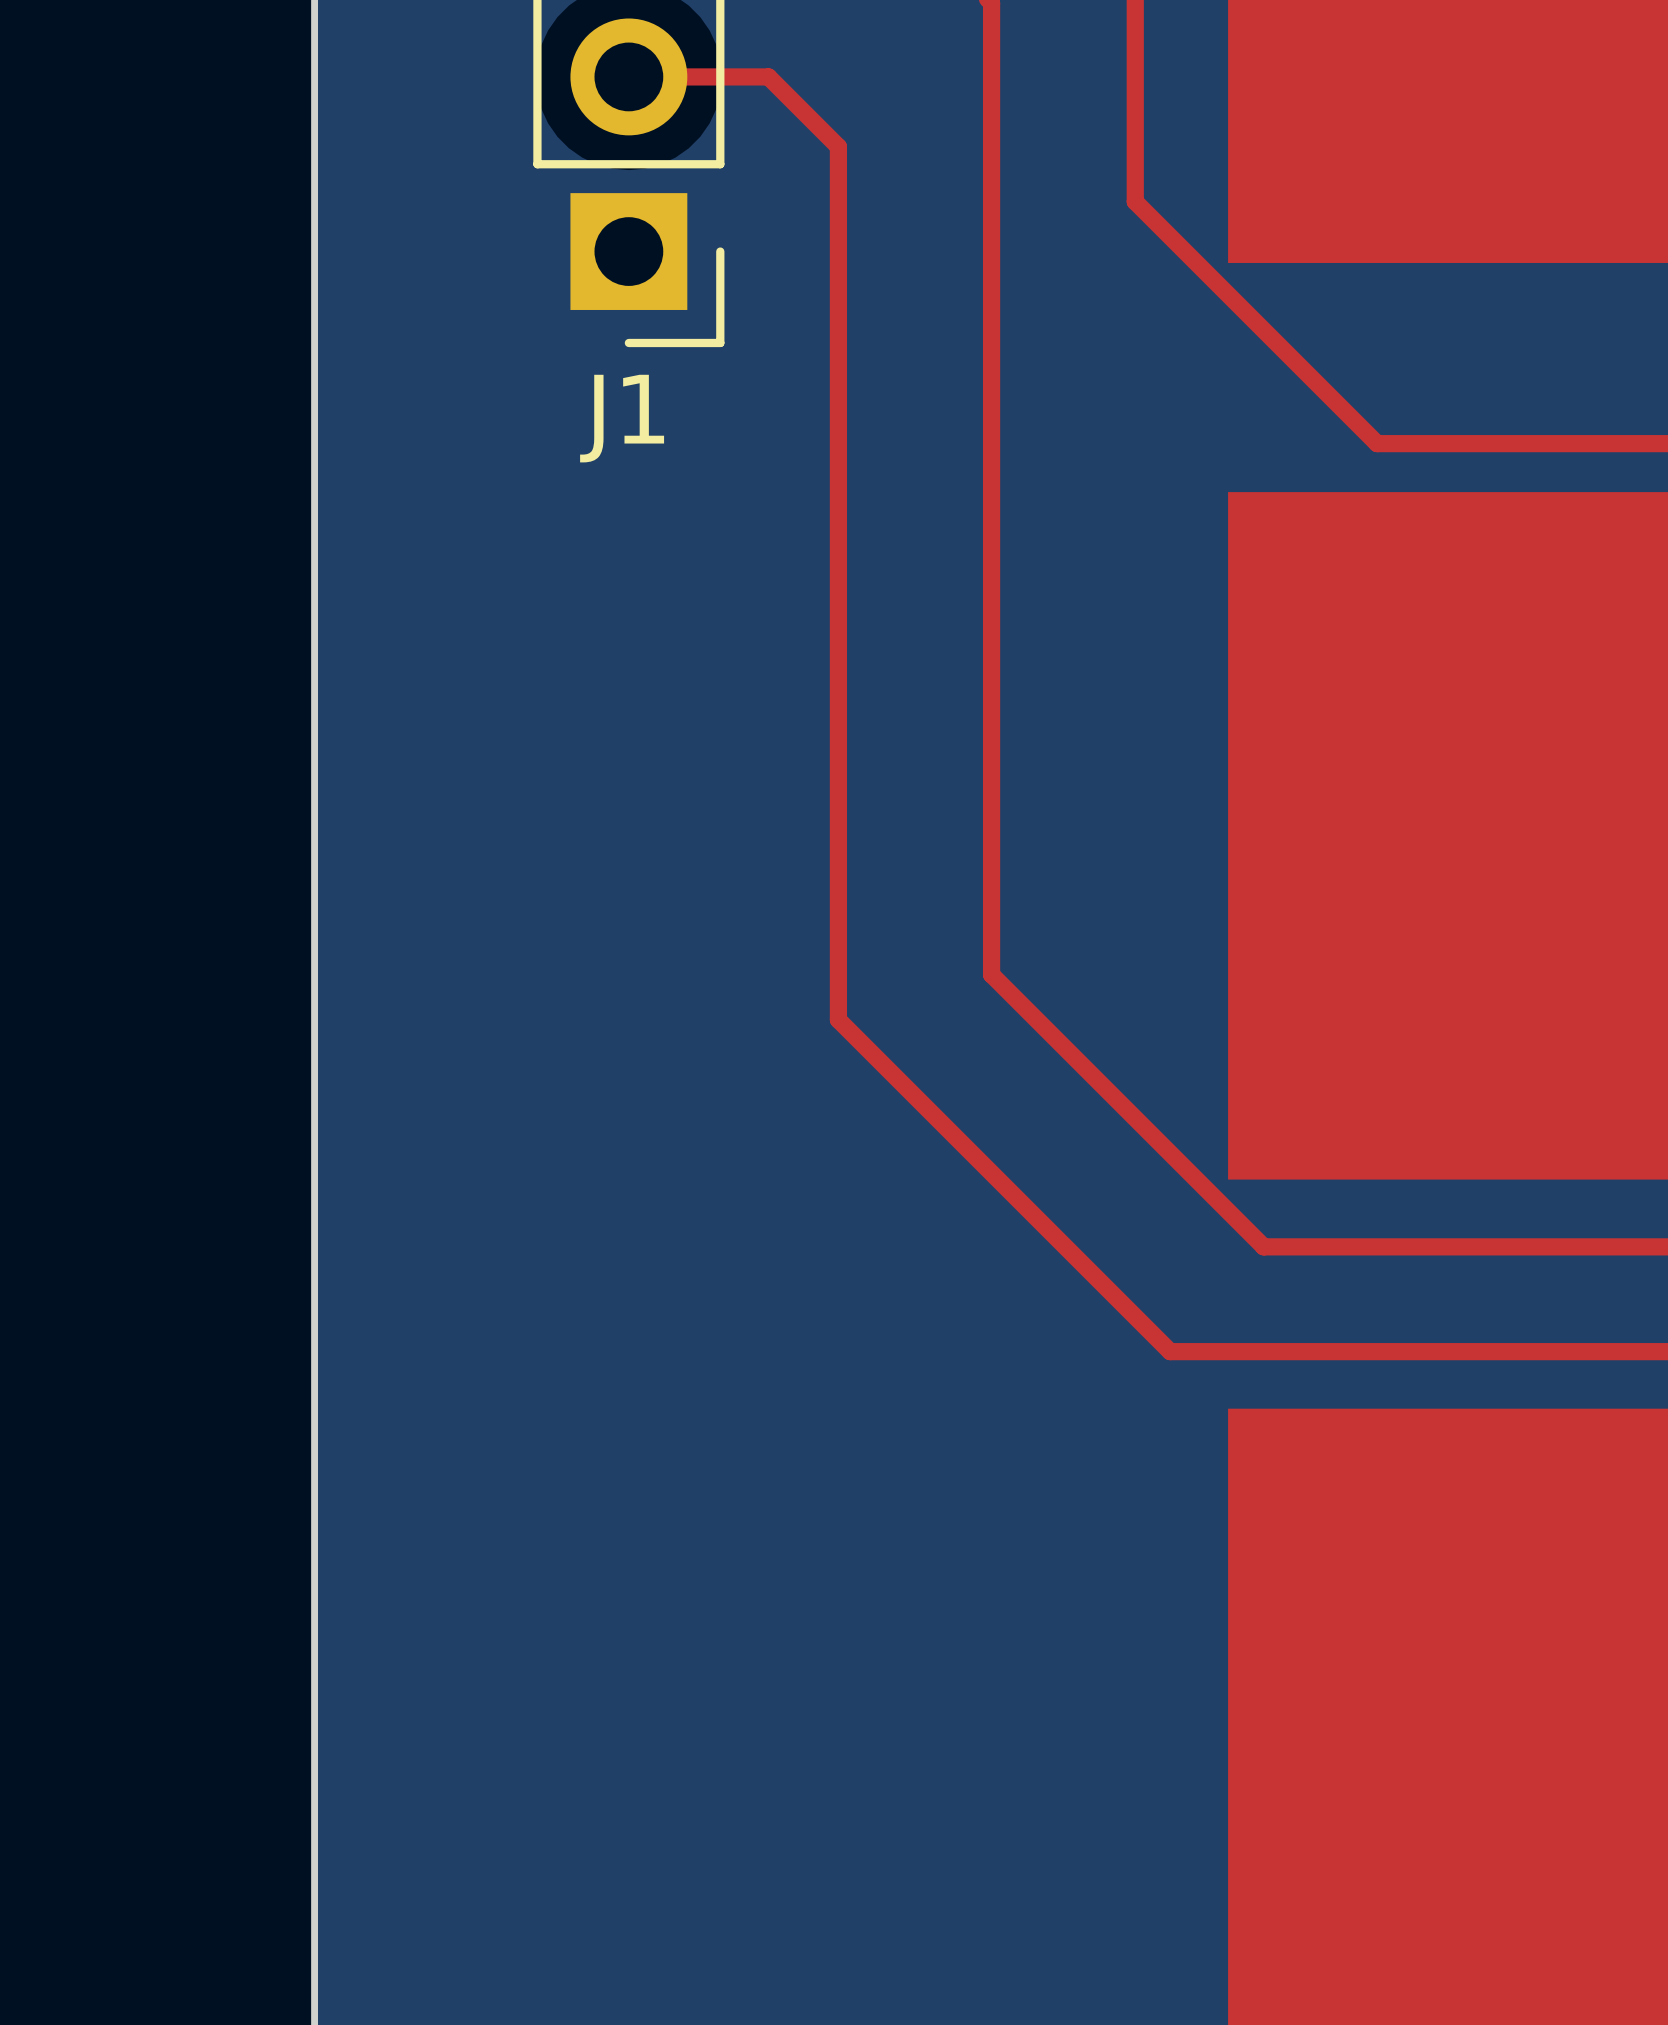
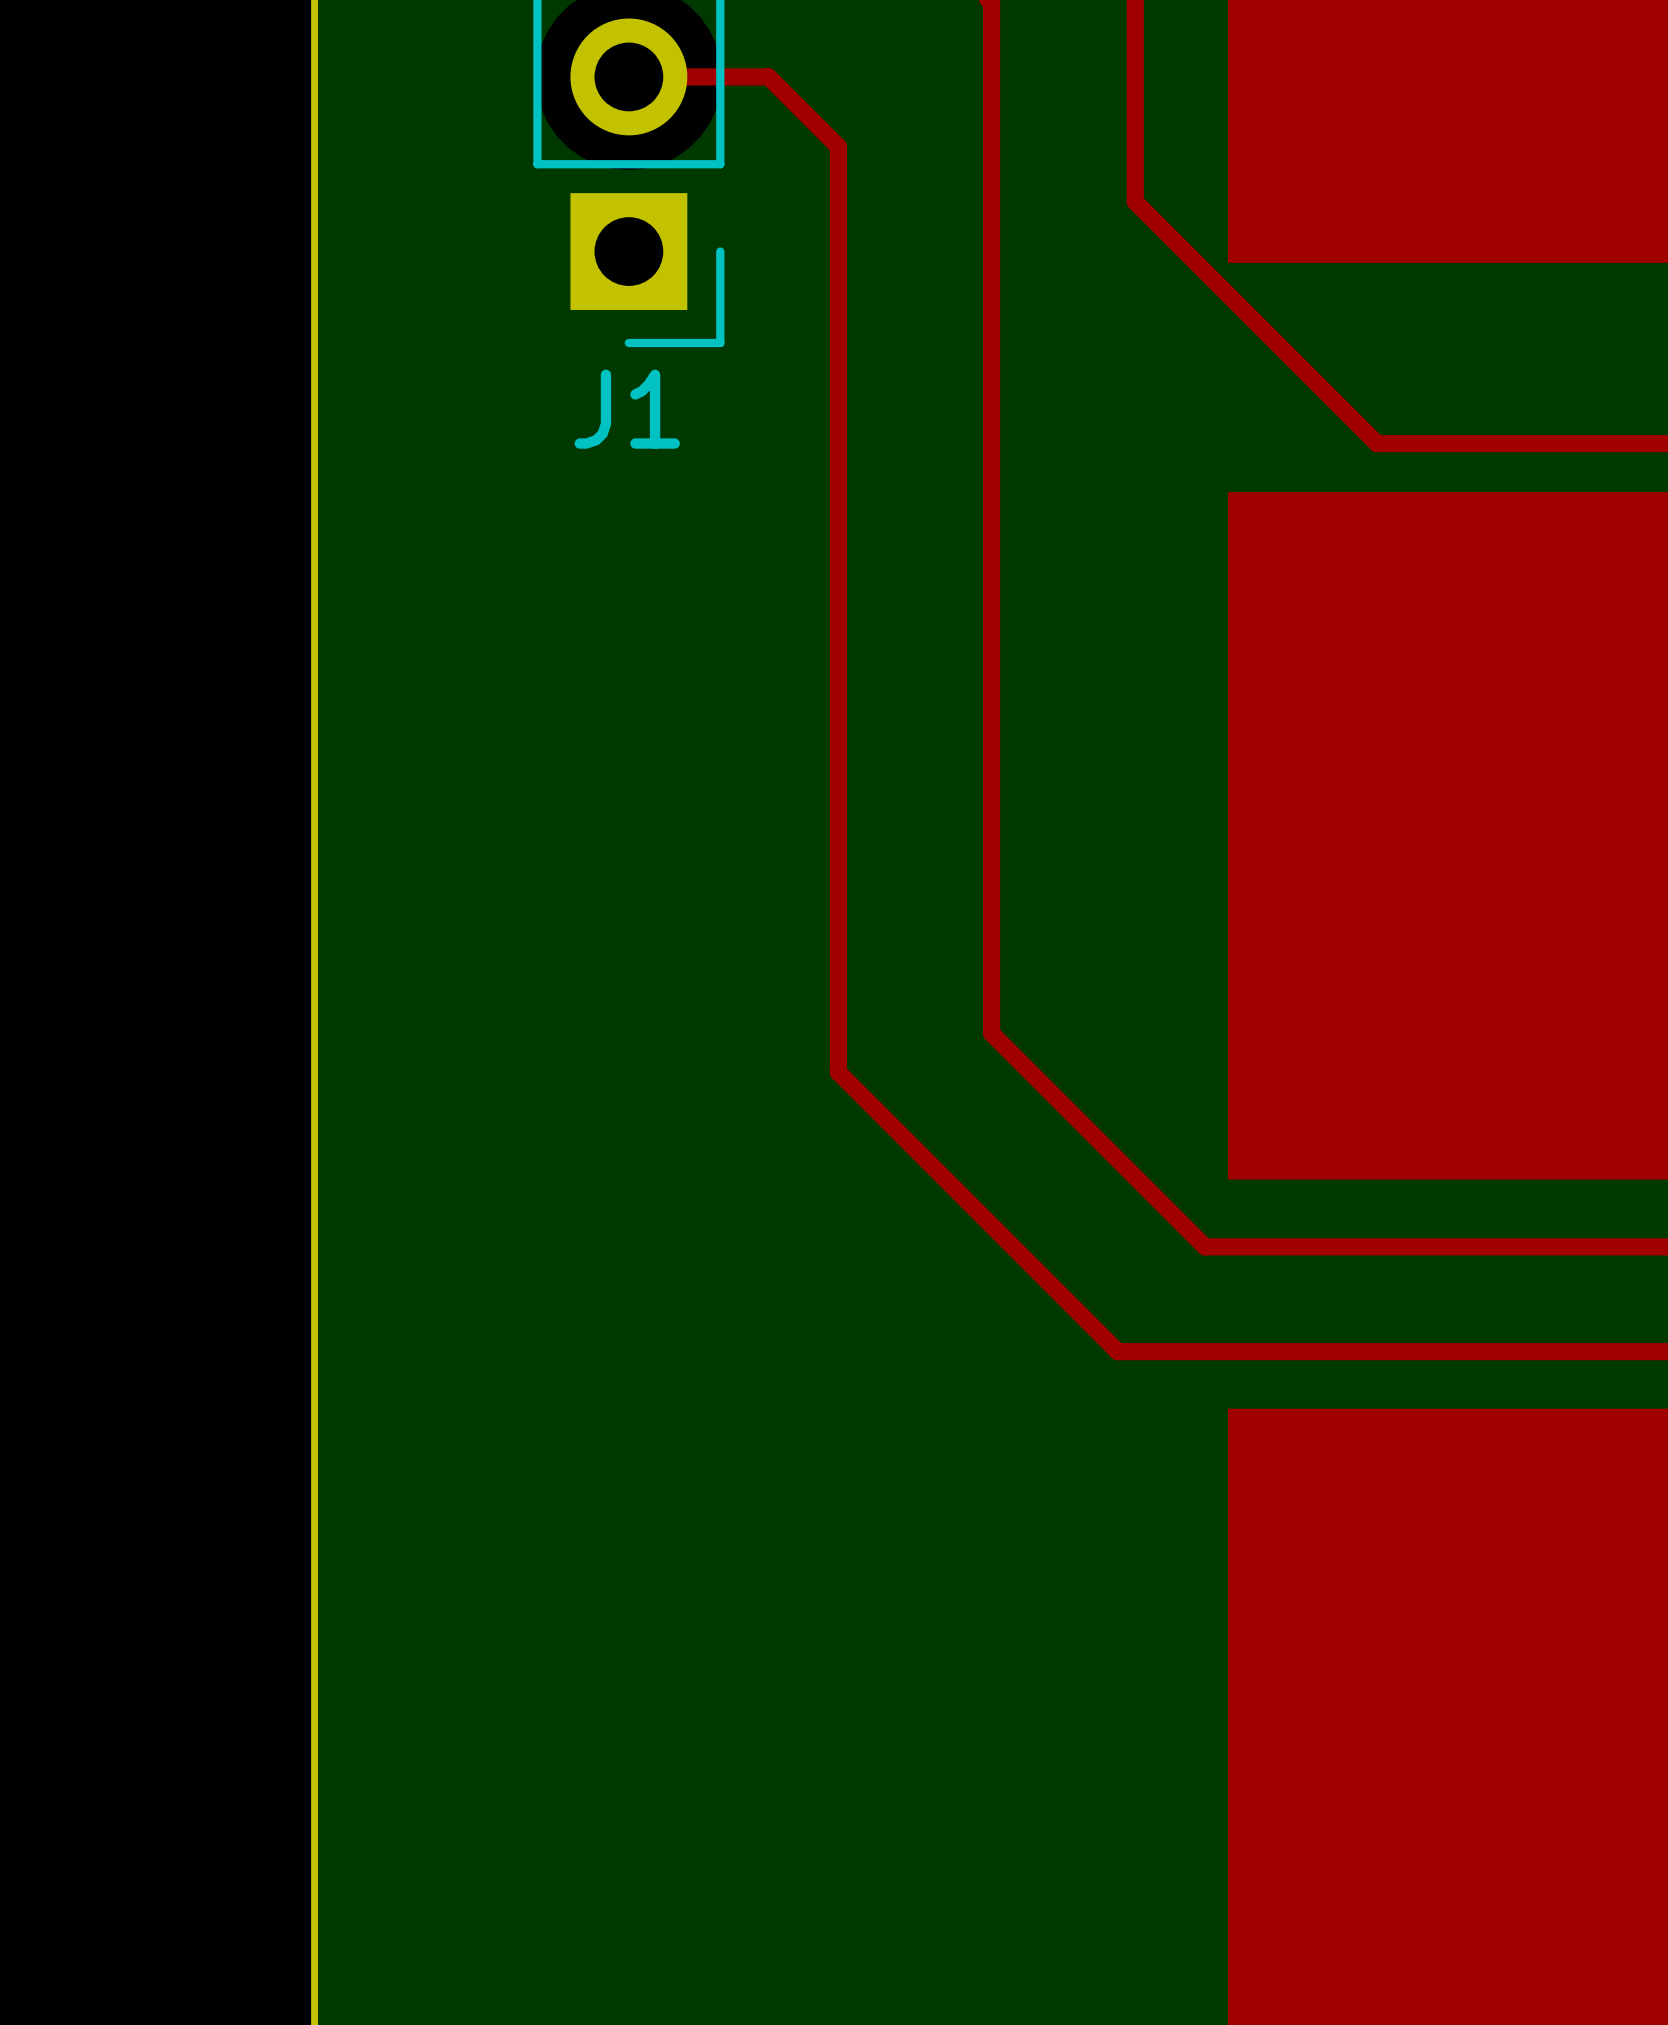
top track: (991, 974) (1263, 1246) -> (991, 974) (991, 1033) (1205, 1246) (1263, 1246)
top track: (838, 1019) (1170, 1351) -> (838, 1019) (838, 1072) (1117, 1351) (1170, 1351)

